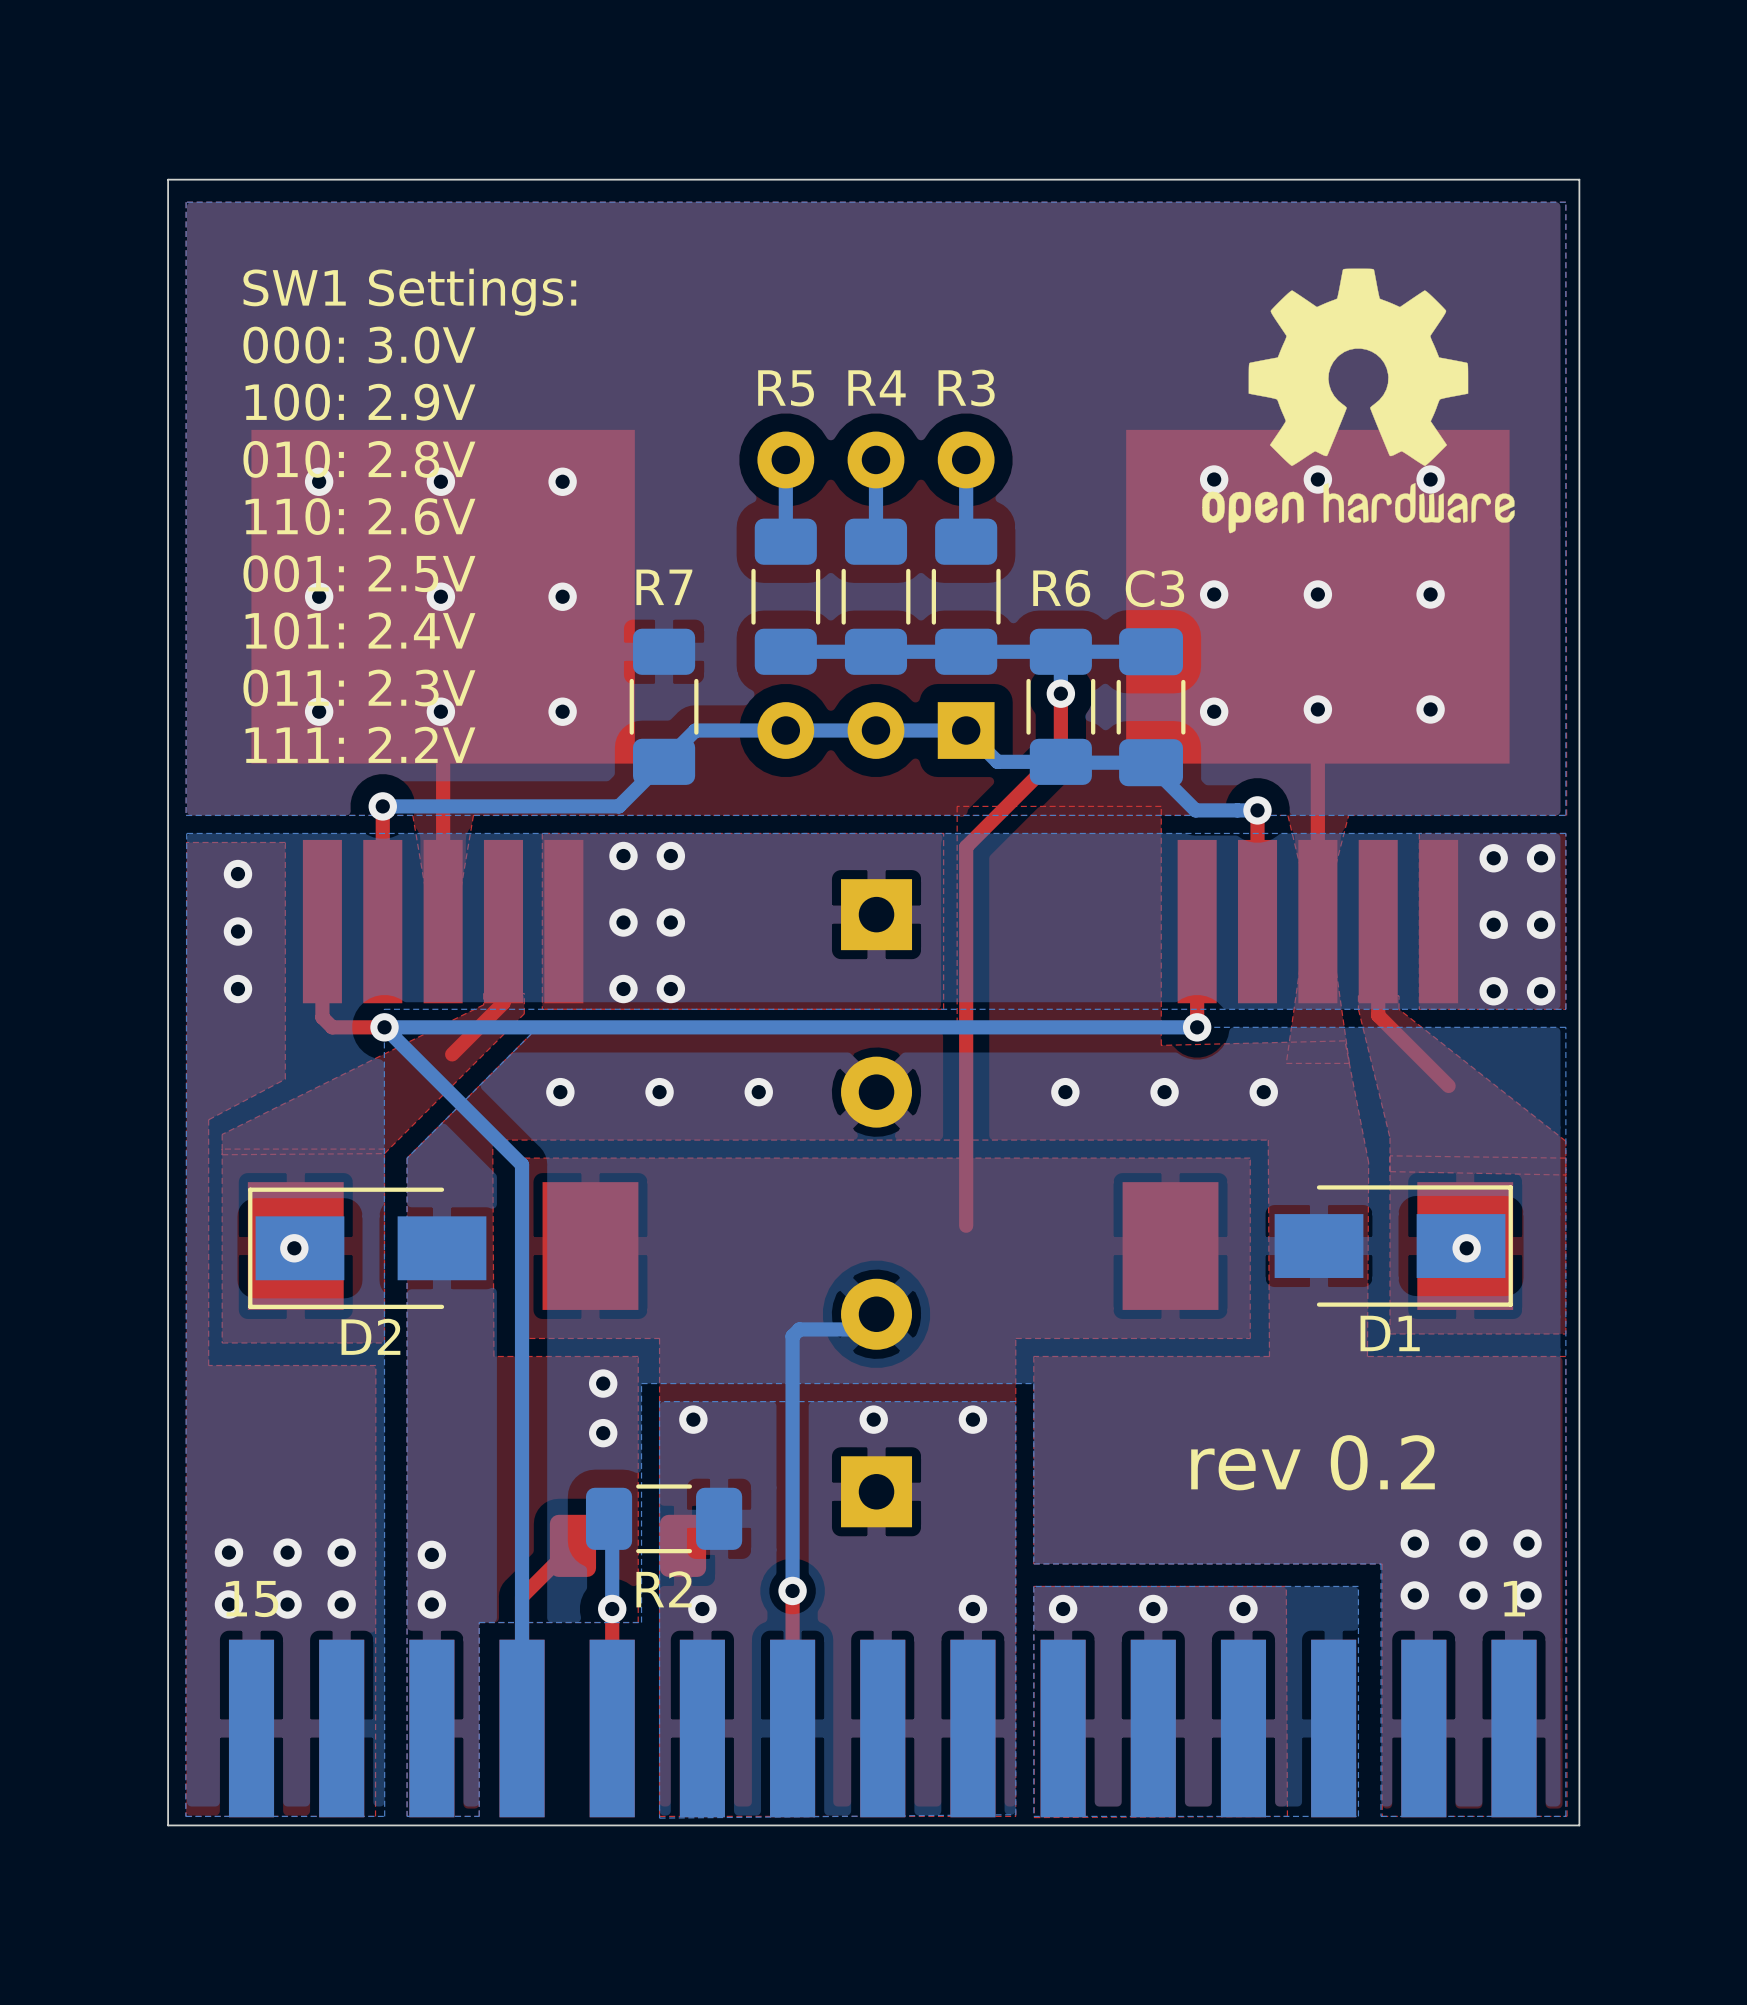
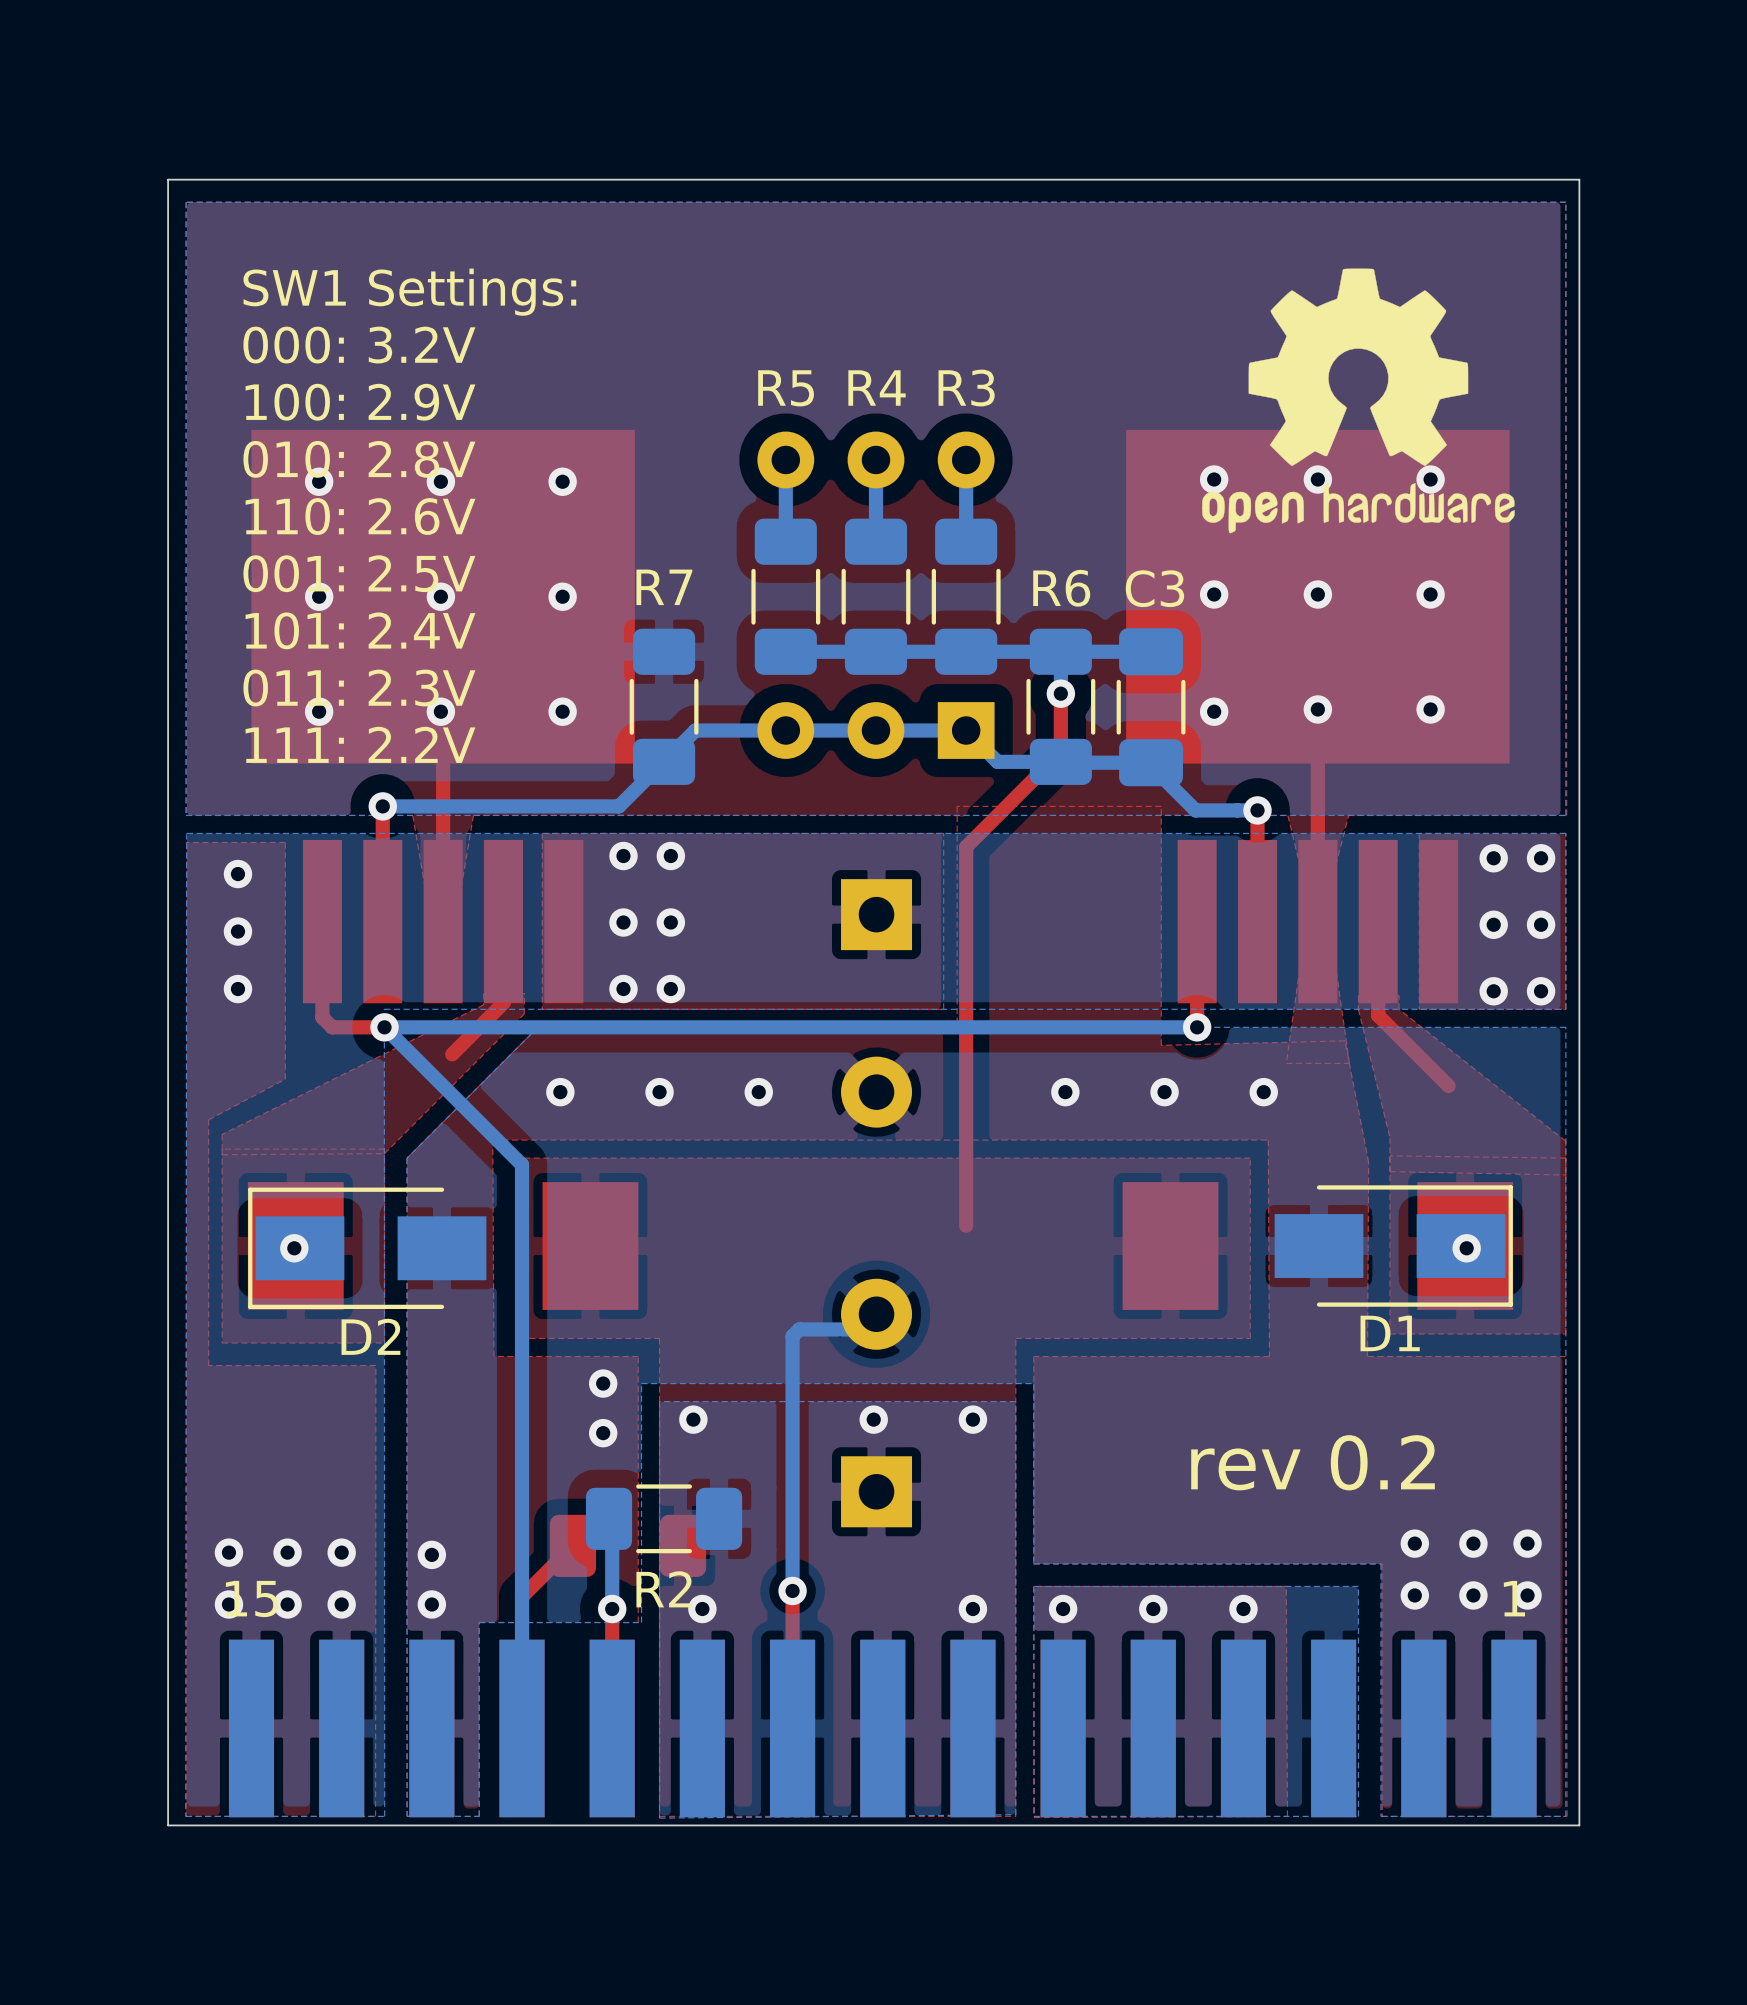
text: 000: 3.0V (359, 345) -> 000: 3.2V (359, 345)

